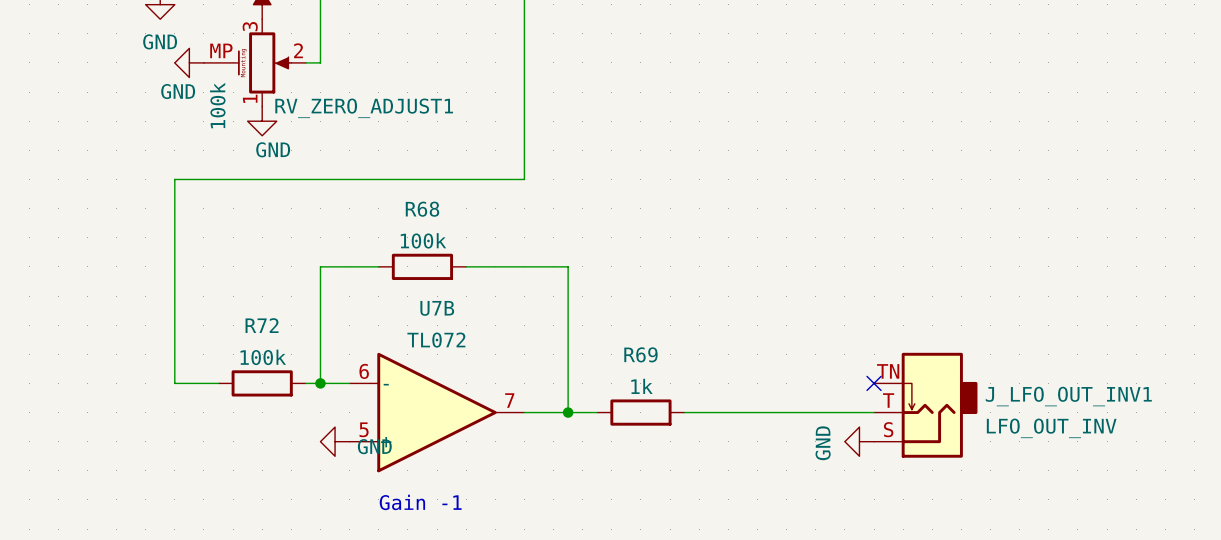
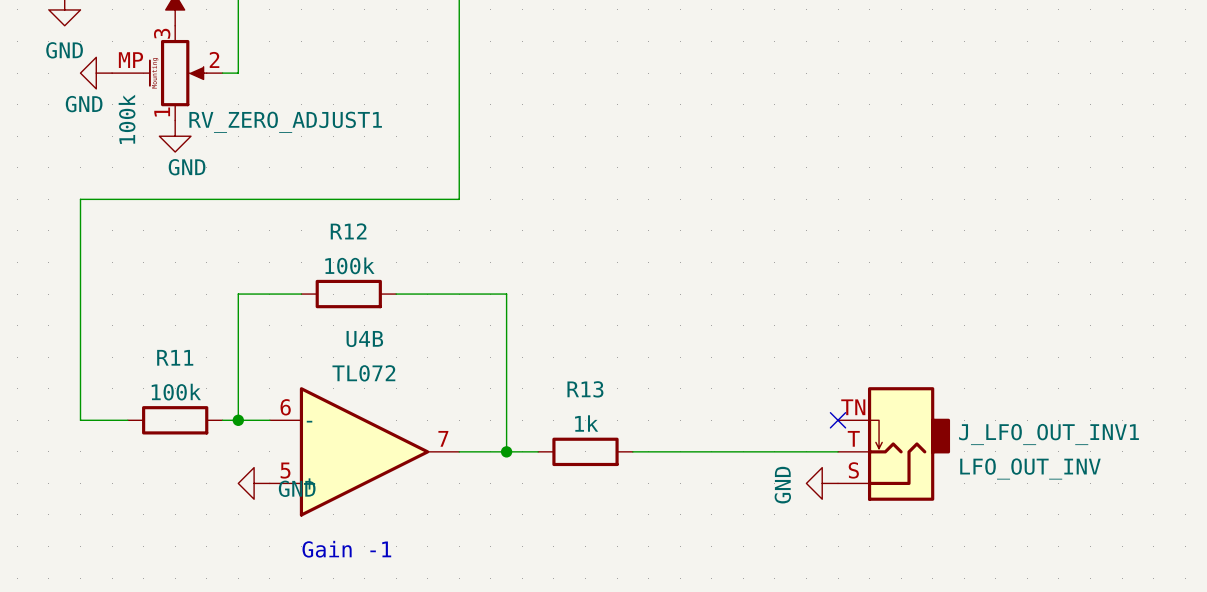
R68 name: R68 (422, 209) -> R12 (348, 231)
U7B name: U7B (437, 308) -> U4B (364, 339)
R72 name: R72 (262, 325) -> R11 (175, 357)
R69 name: R69 (640, 354) -> R13 (585, 389)

